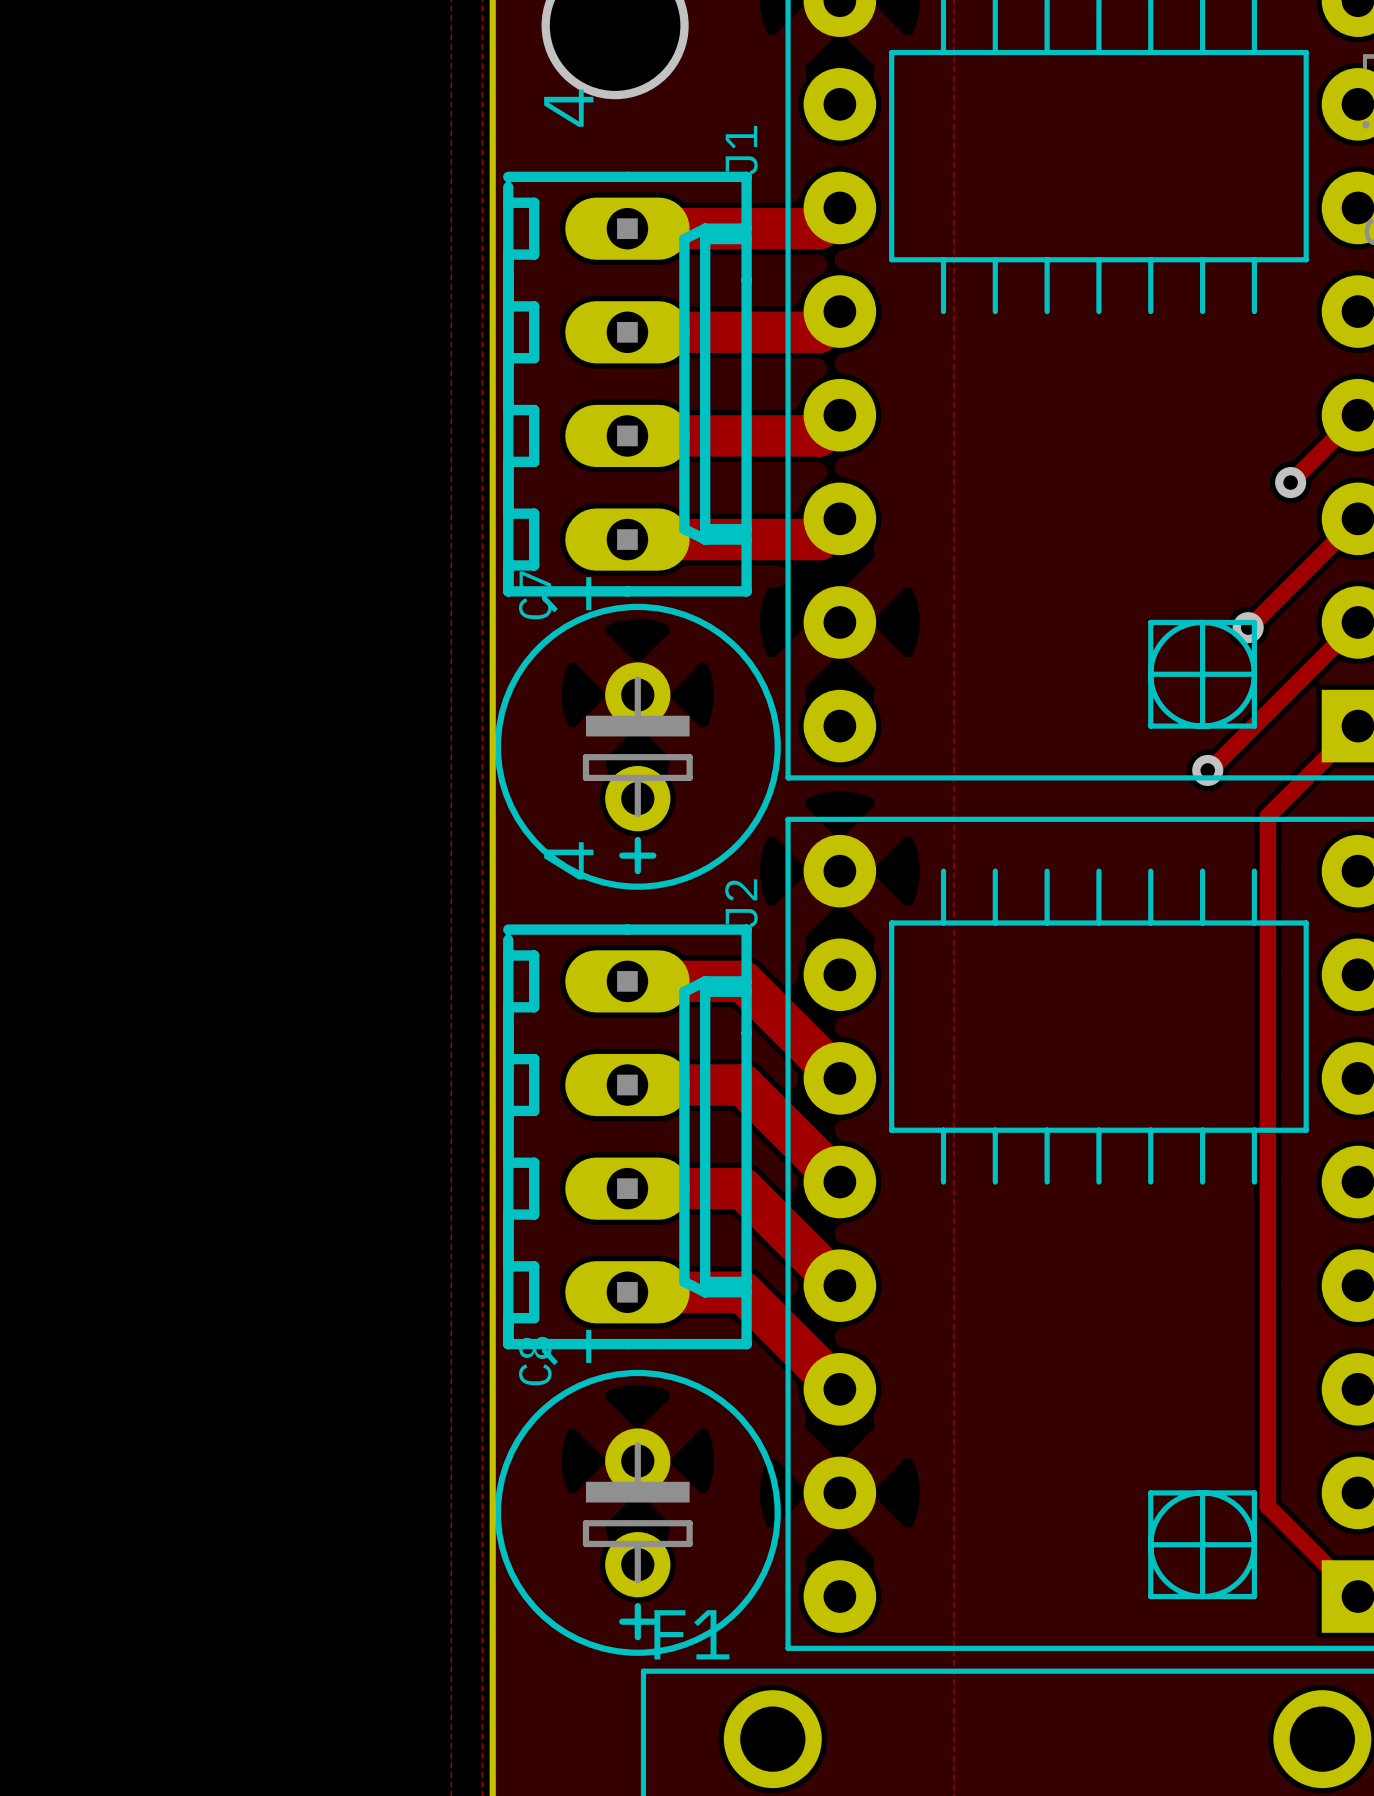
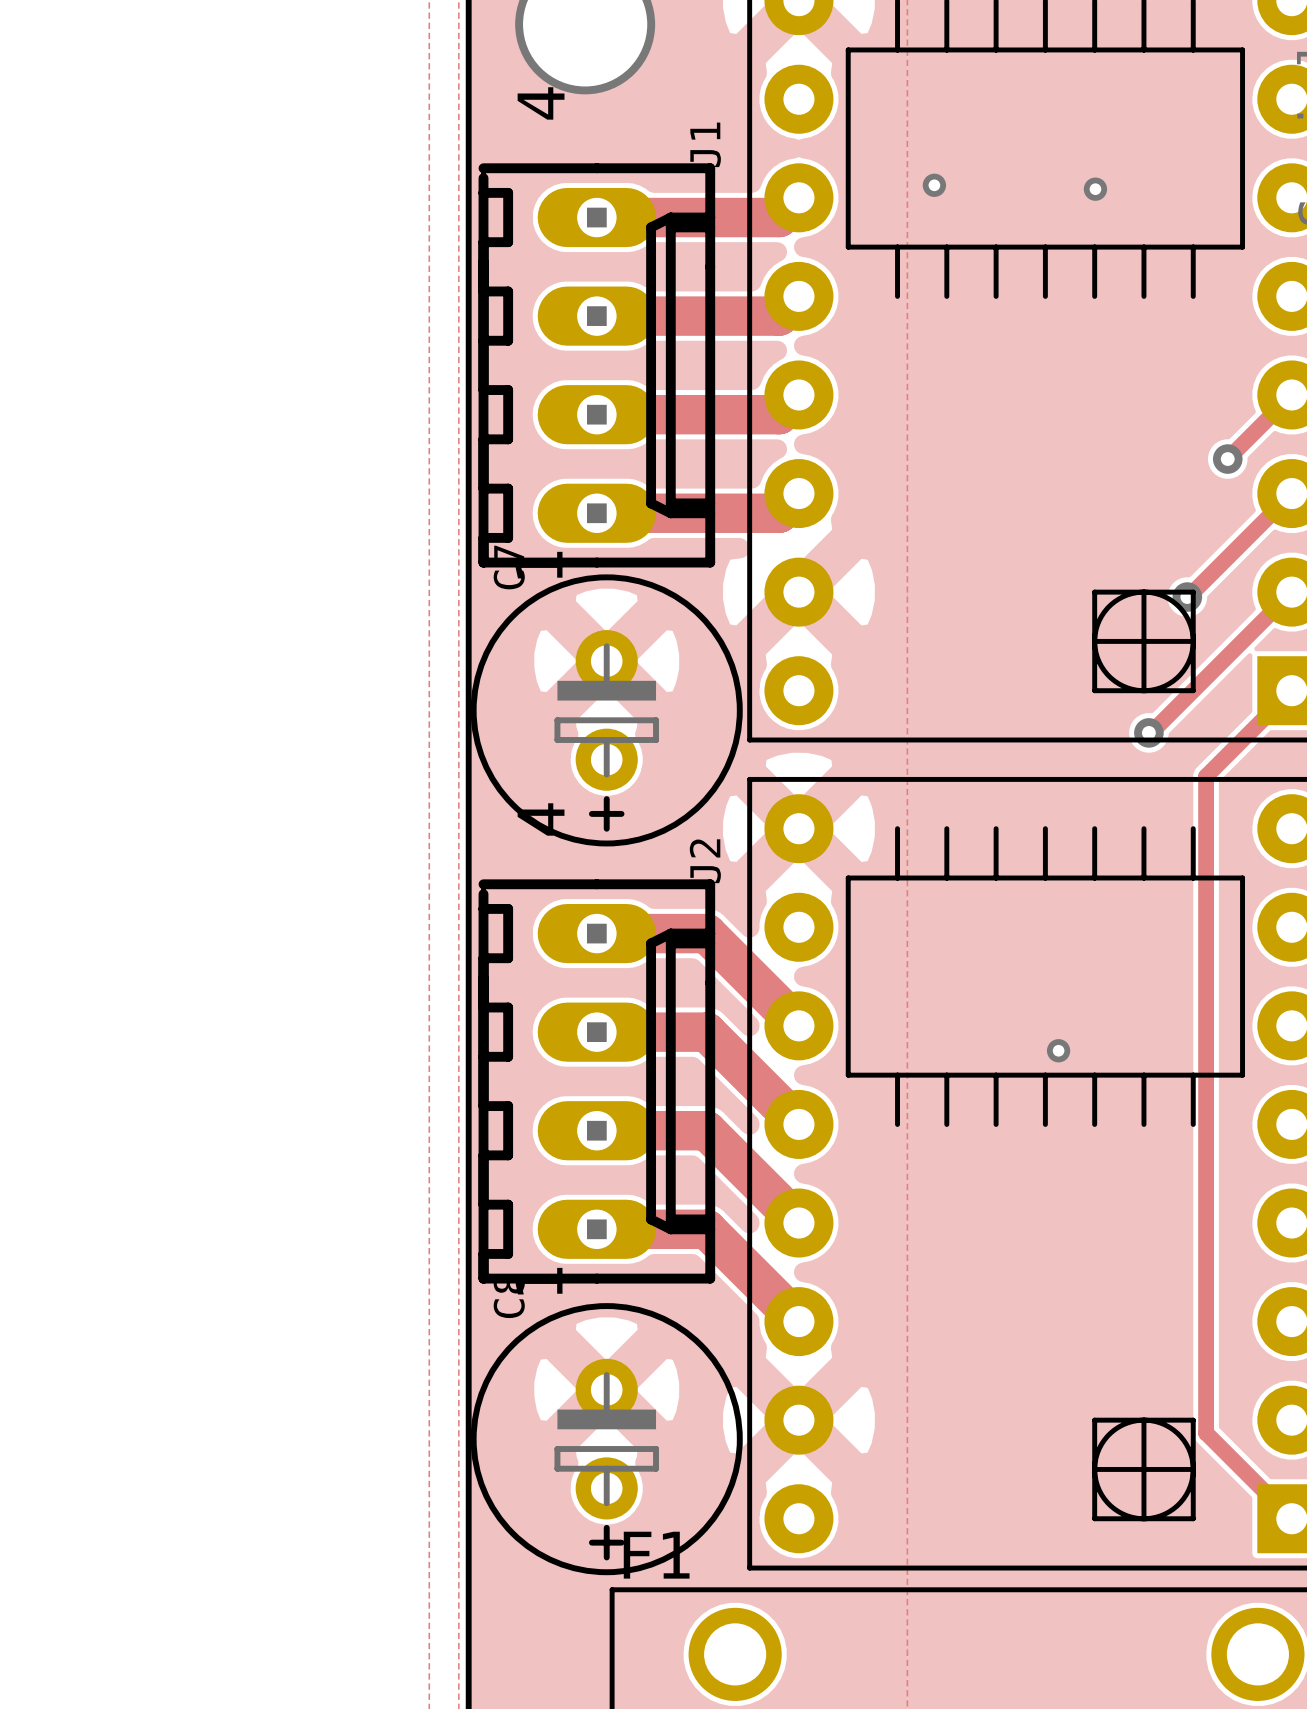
via: none -> (934, 185)
via: none -> (1095, 189)
via: none -> (1058, 1050)

